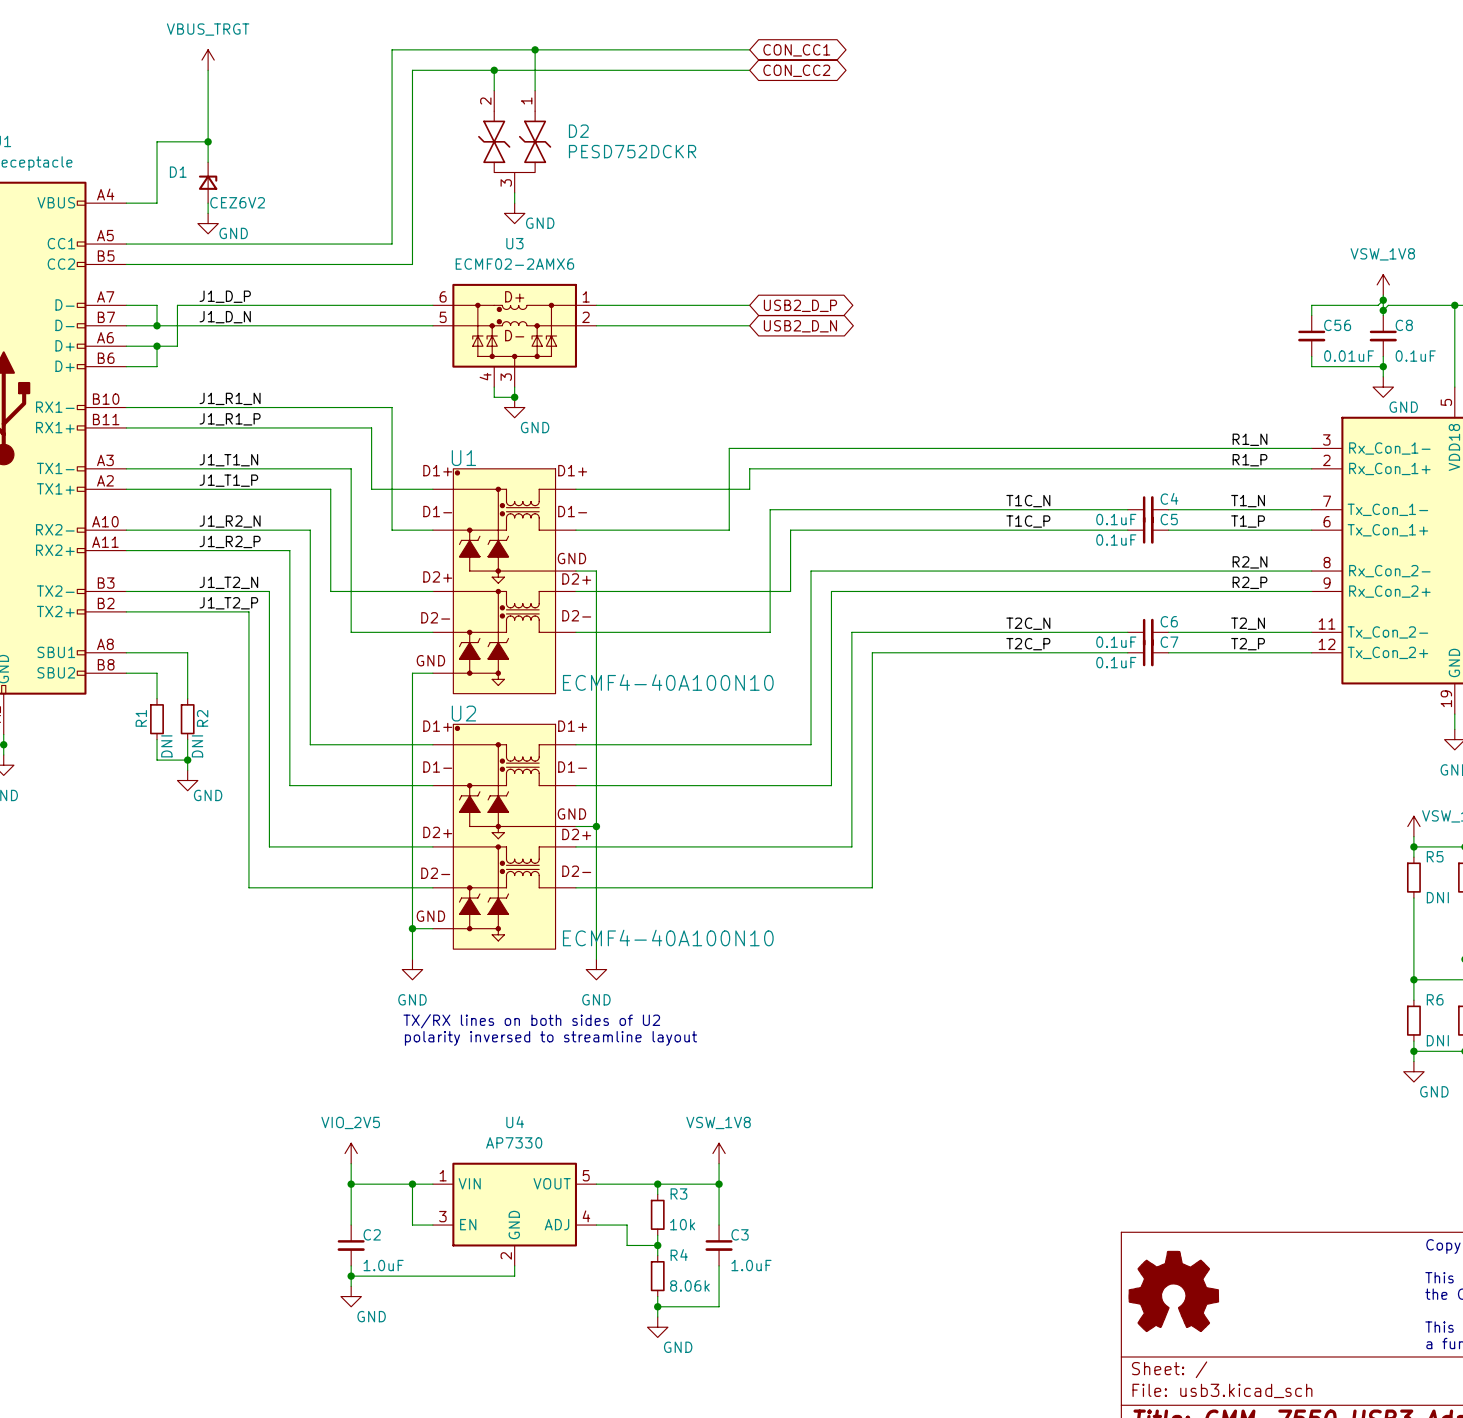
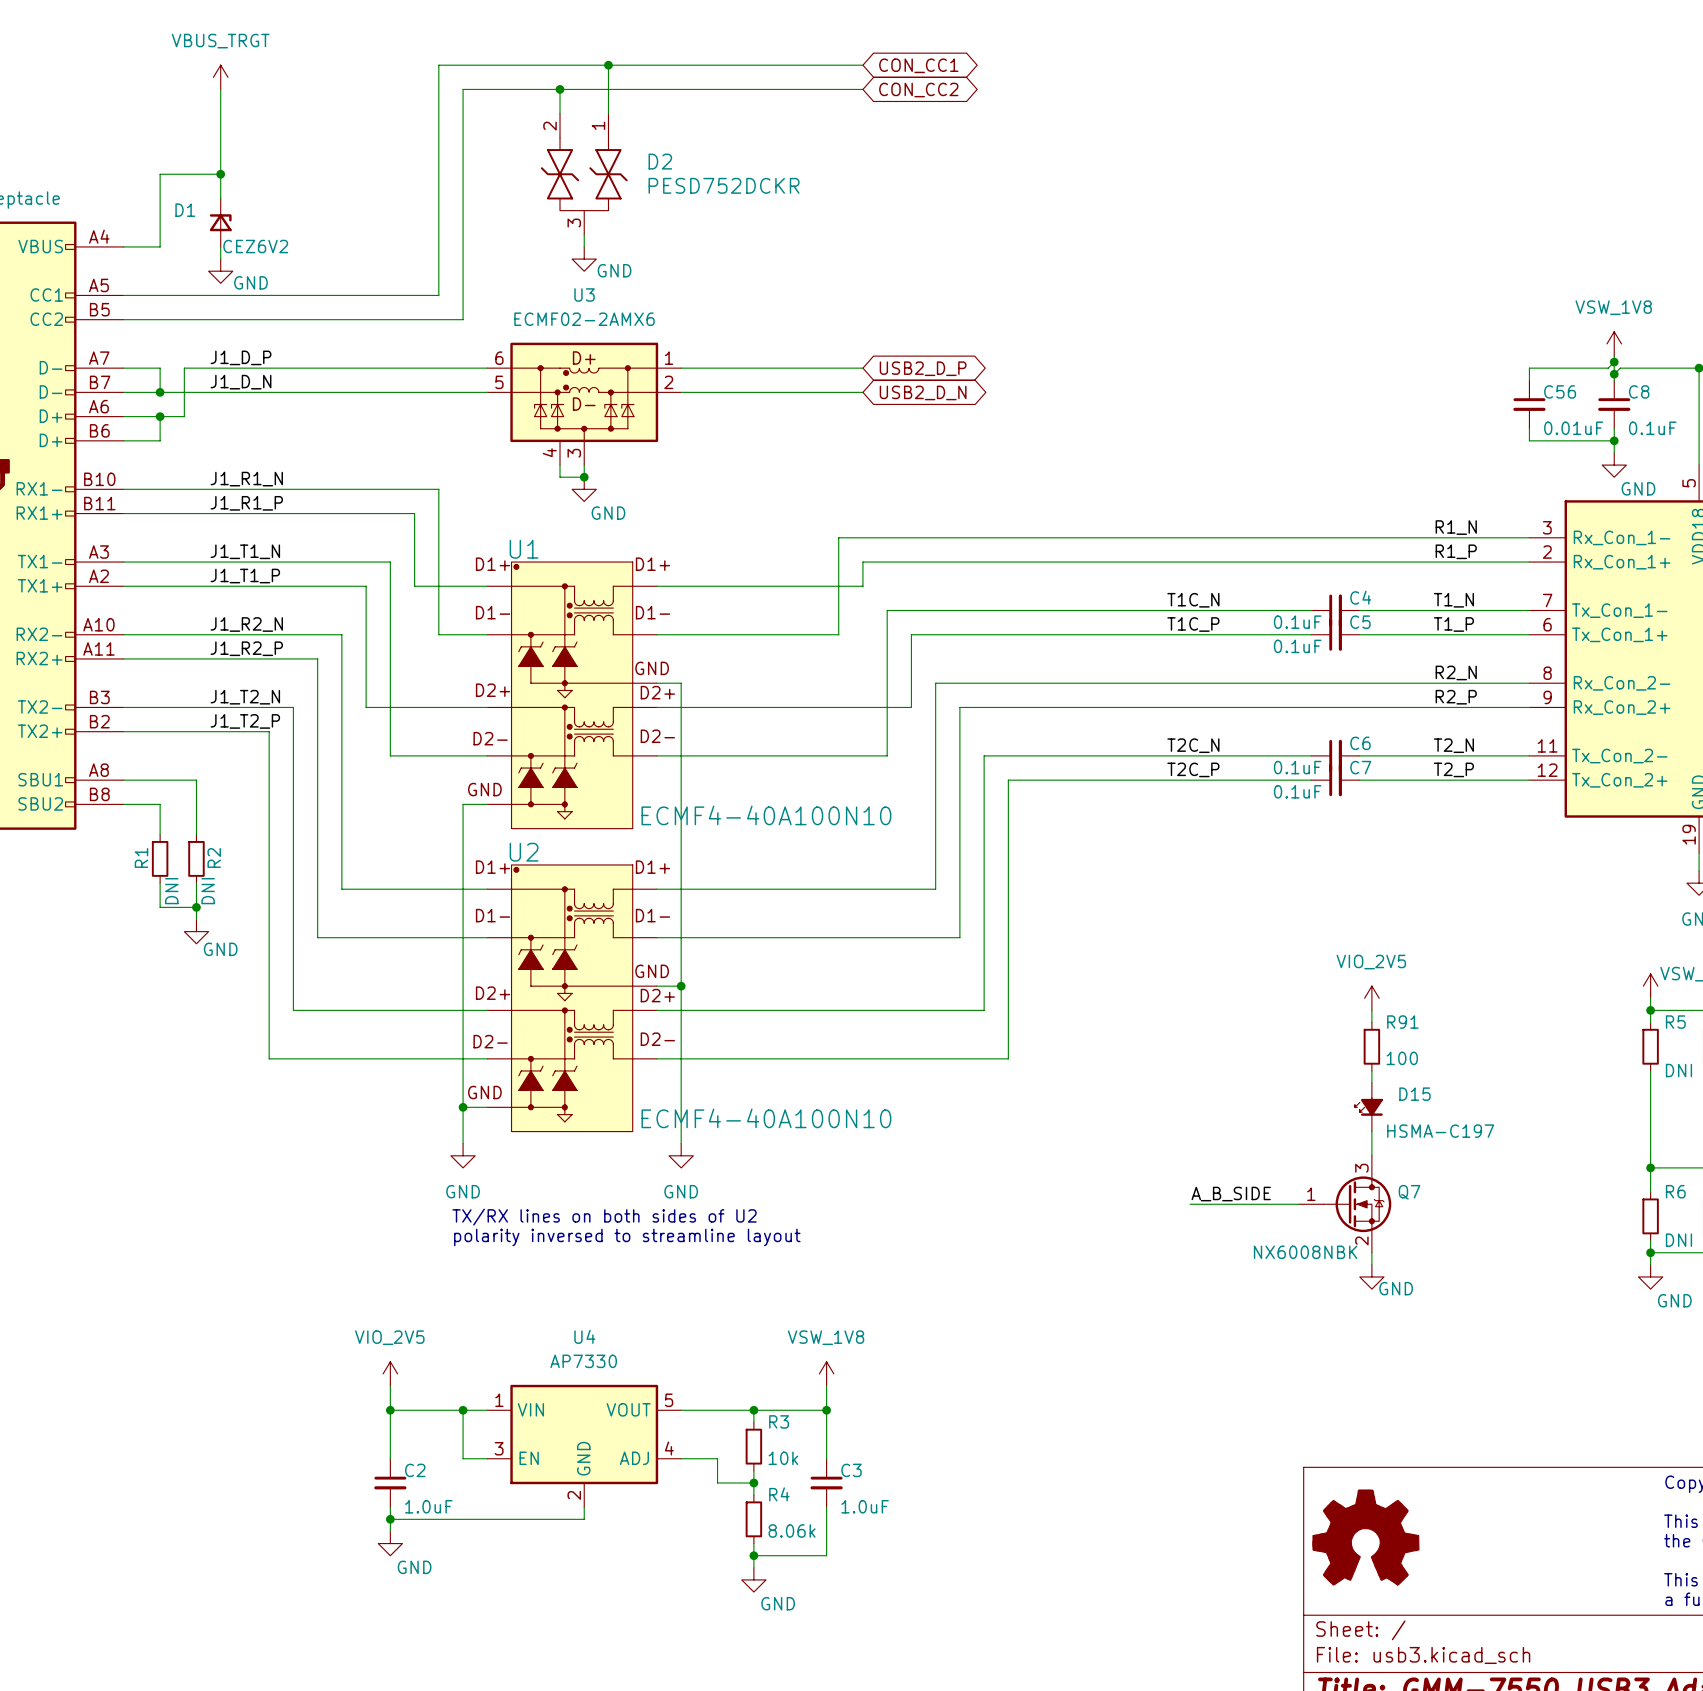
power symbol: none -> VIO_2V5 (1371, 998)
wire: none -> (1371, 1010) (1371, 1022)
R91: none -> 100 (1371, 1046)
wire: none -> (1371, 1070) (1371, 1083)
D15: none -> HSMA-C197 (1368, 1107)
wire: none -> (1371, 1131) (1371, 1155)
label: none -> A_B_SIDE (1231, 1194)
wire: none -> (1190, 1204) (1299, 1204)
Q7: none -> NX6008NBK (1345, 1204)
wire: none -> (1371, 1252) (1371, 1264)
power symbol: none -> GND (1371, 1276)

